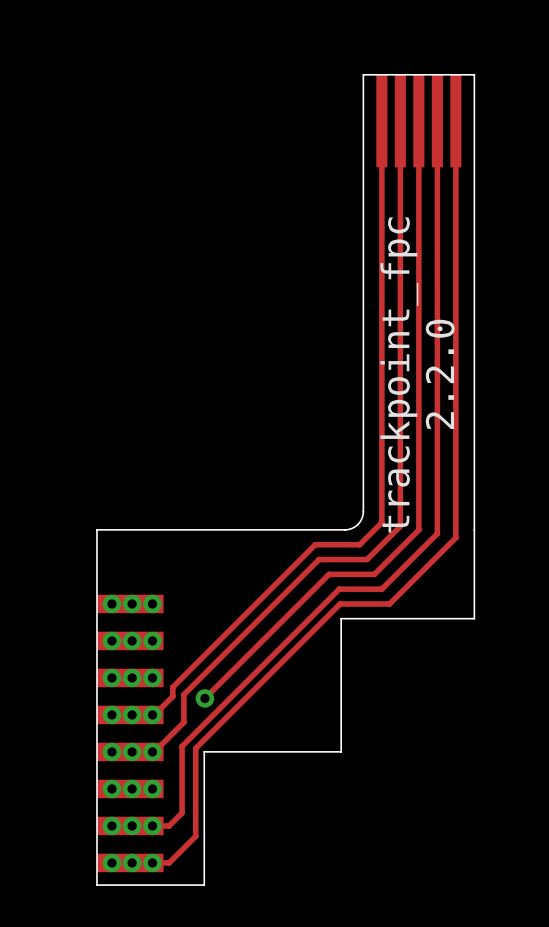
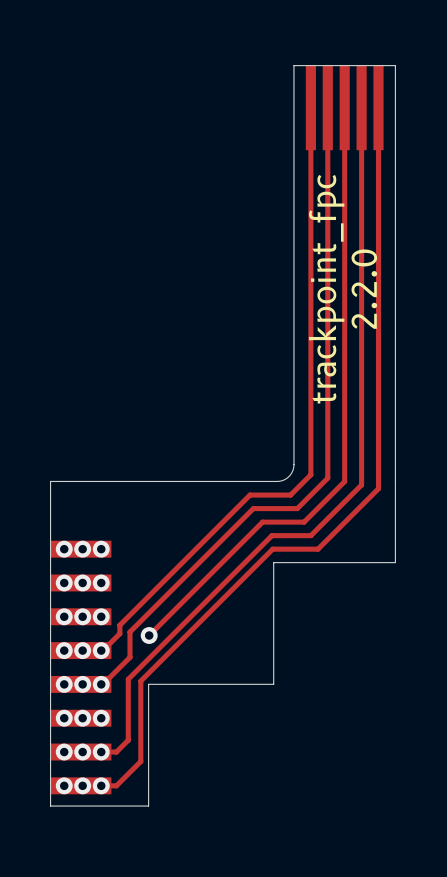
text position: trackpoint_fpc (399, 374) -> trackpoint_fpc (326, 289)
text position: 2.2.0 (440, 374) -> 2.2.0 (364, 289)

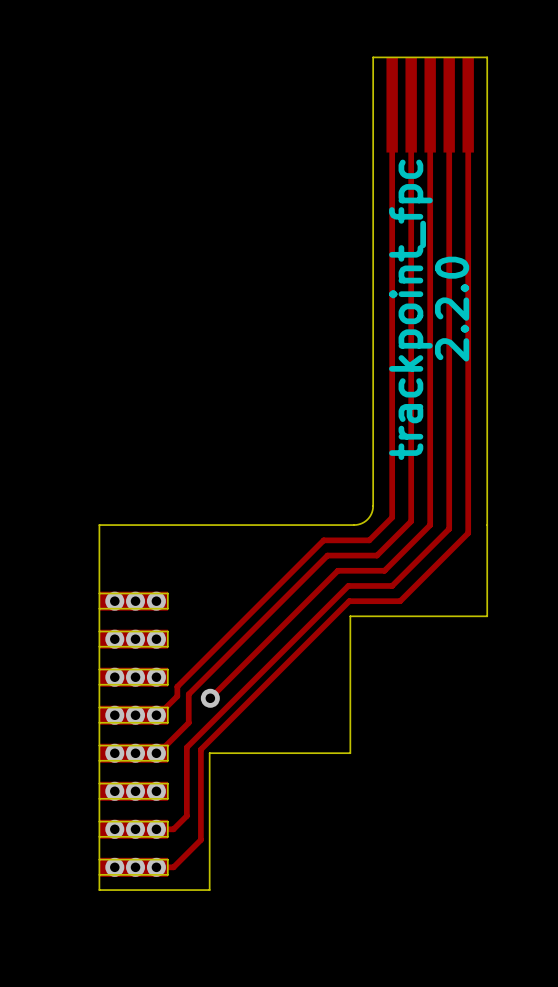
board edge: none -> (99, 593) (167, 593) (167, 608) (99, 608)
board edge: none -> (99, 631) (167, 631) (167, 646) (99, 646)
board edge: none -> (99, 669) (167, 669) (167, 684) (99, 684)
board edge: none -> (99, 707) (167, 707) (167, 722) (99, 722)
board edge: none -> (99, 745) (167, 745) (167, 760) (99, 760)
board edge: none -> (99, 783) (167, 783) (167, 798) (99, 798)
board edge: none -> (99, 821) (167, 821) (167, 836) (99, 836)
board edge: none -> (99, 859) (167, 859) (167, 874) (99, 874)

